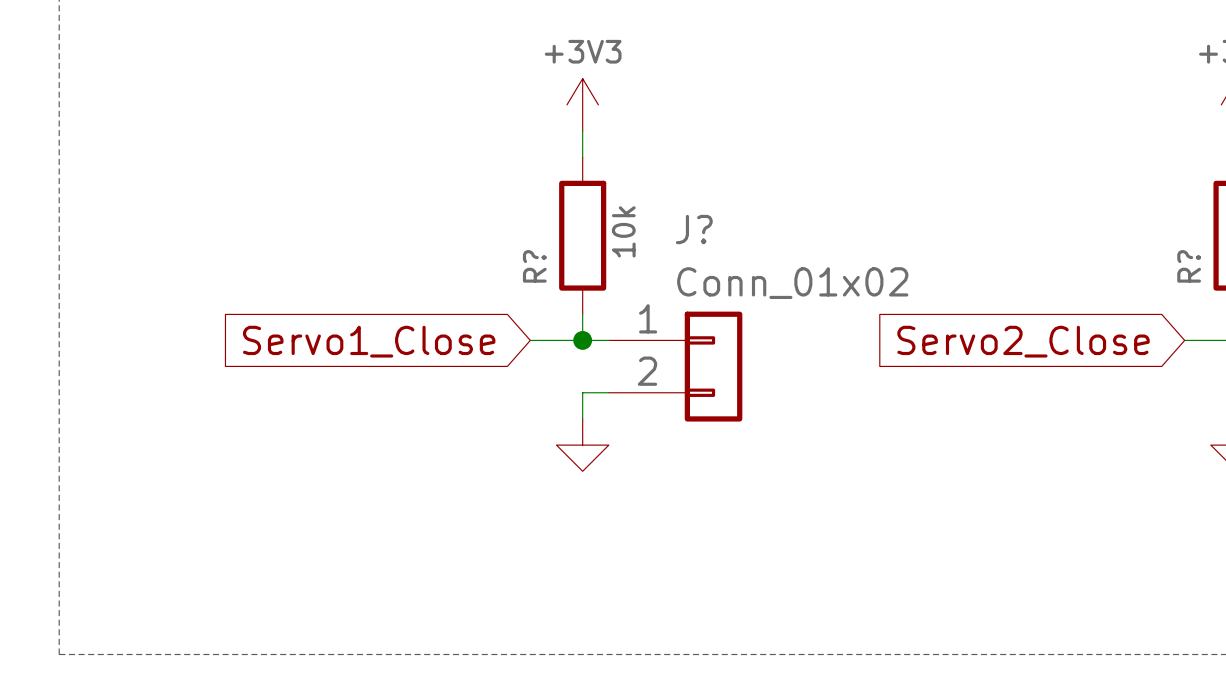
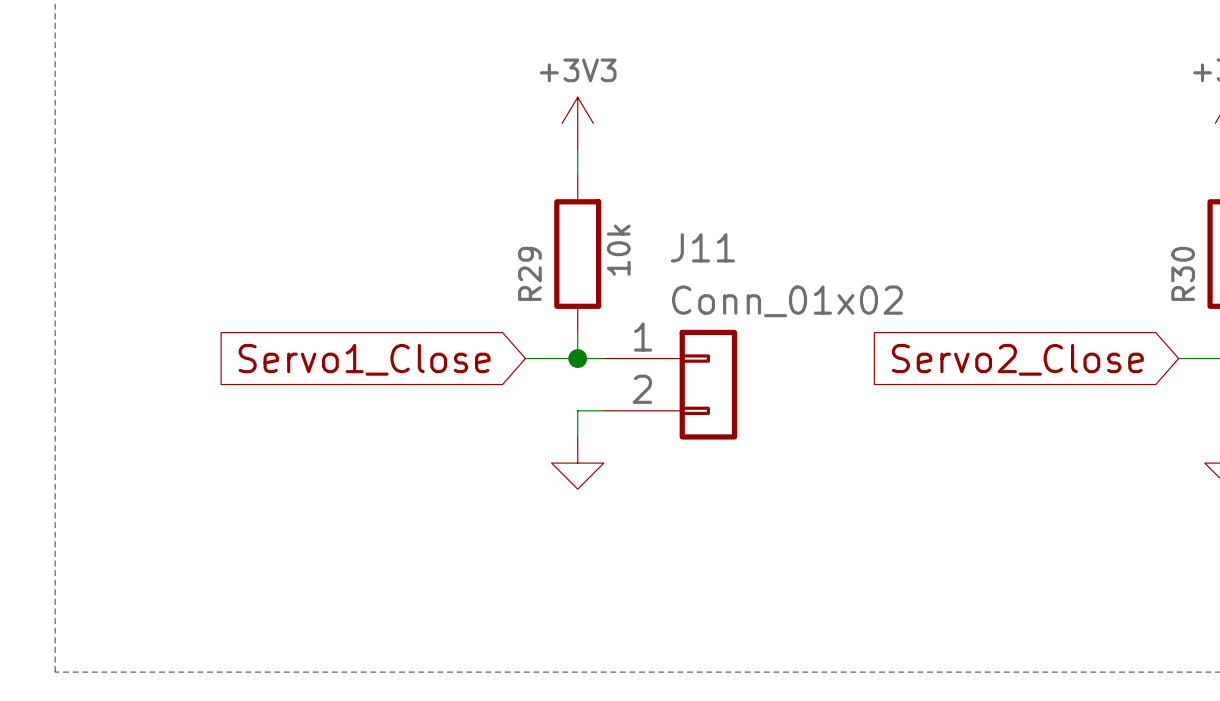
J? name: J? (694, 229) -> J11 (702, 247)
R? name: R? (534, 266) -> R29 (529, 273)
R? name: R? (1189, 266) -> R30 (1183, 273)

